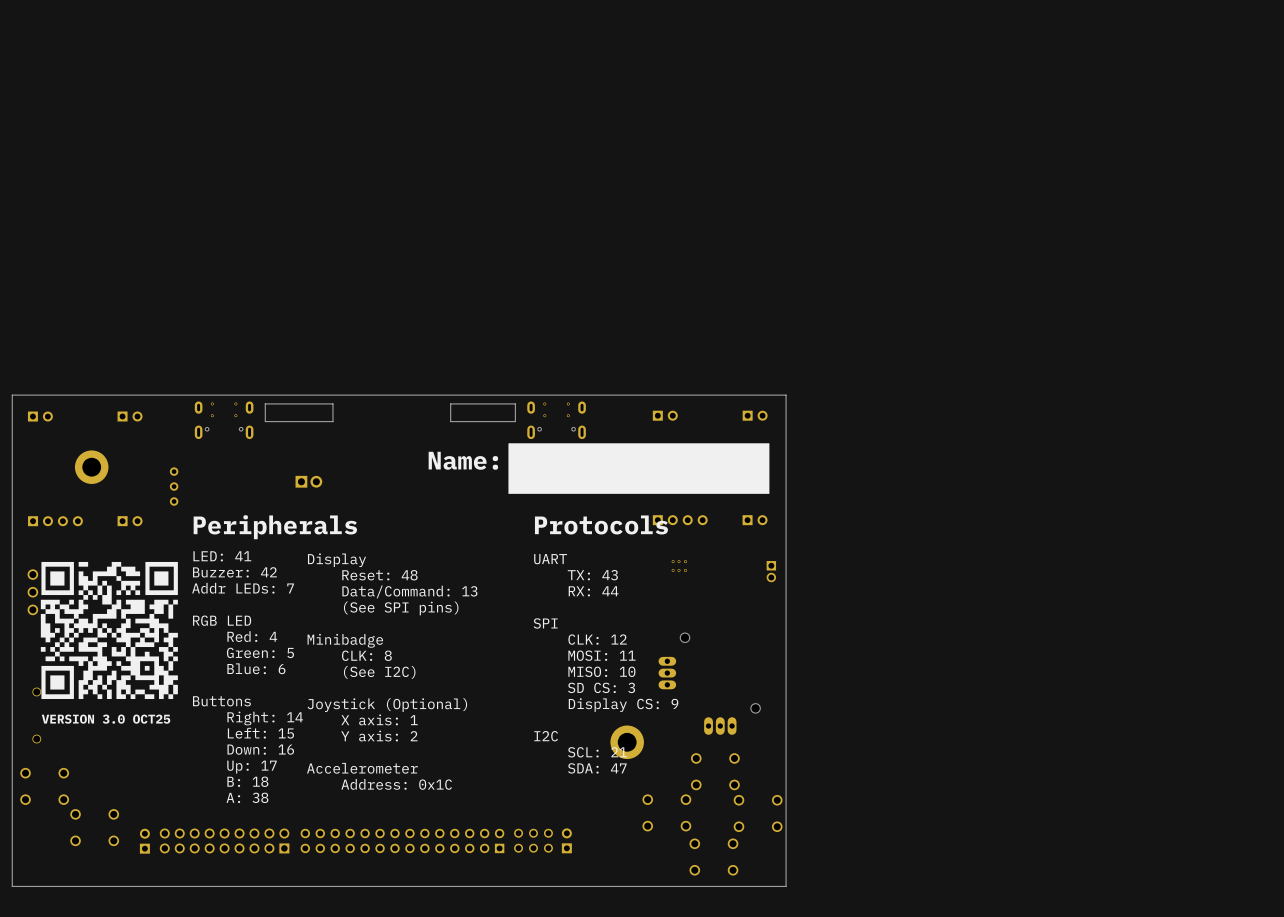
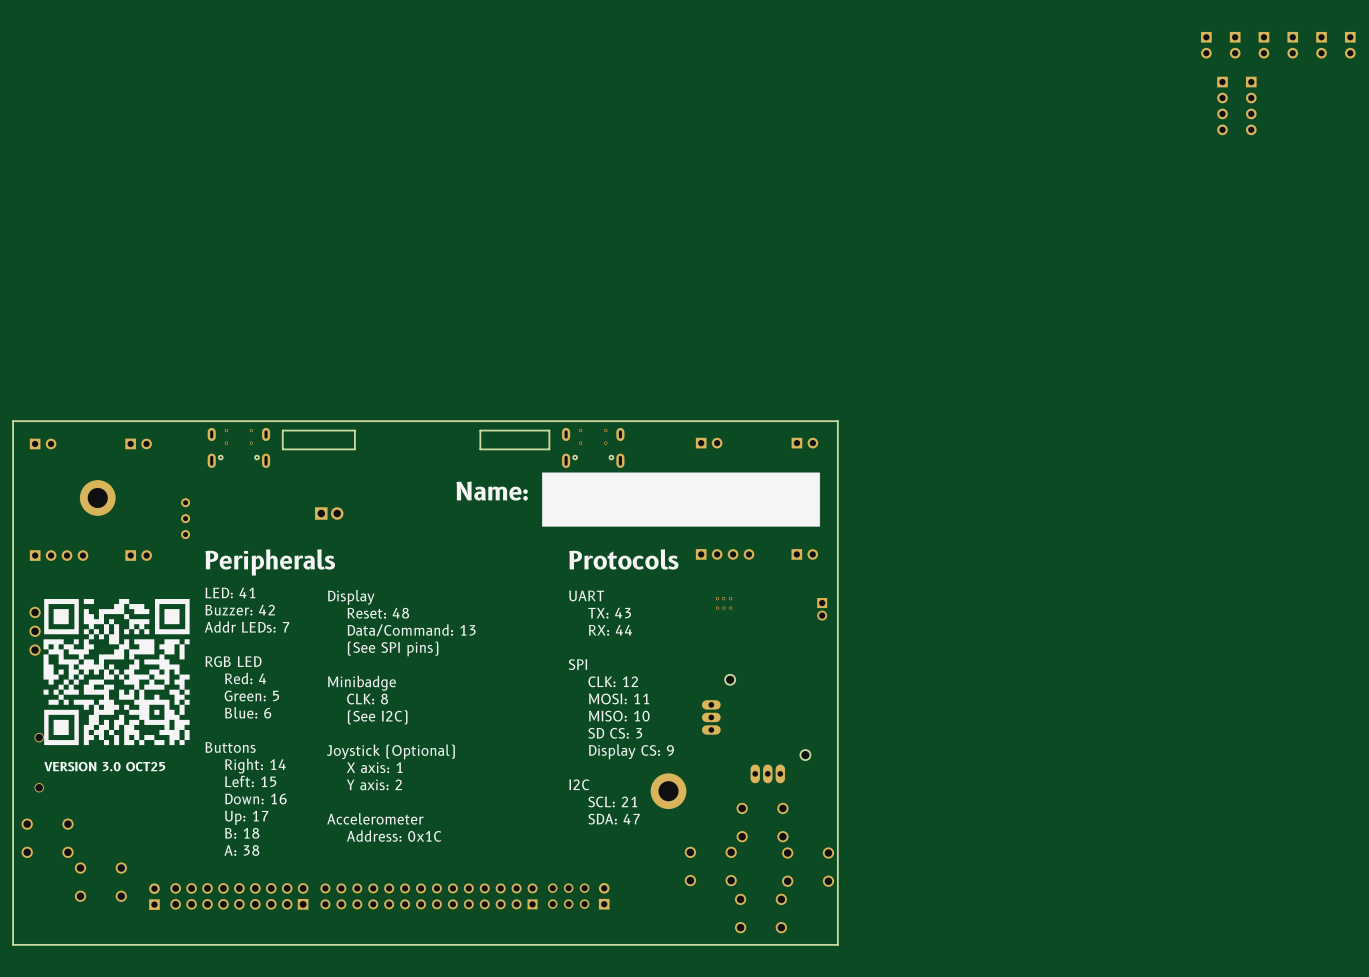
part: none -> (1206, 45)
part: none -> (1235, 45)
part: none -> (1263, 45)
part: none -> (1292, 45)
part: none -> (1321, 45)
part: none -> (1350, 45)
part: none -> (1222, 105)
part: none -> (1251, 105)

